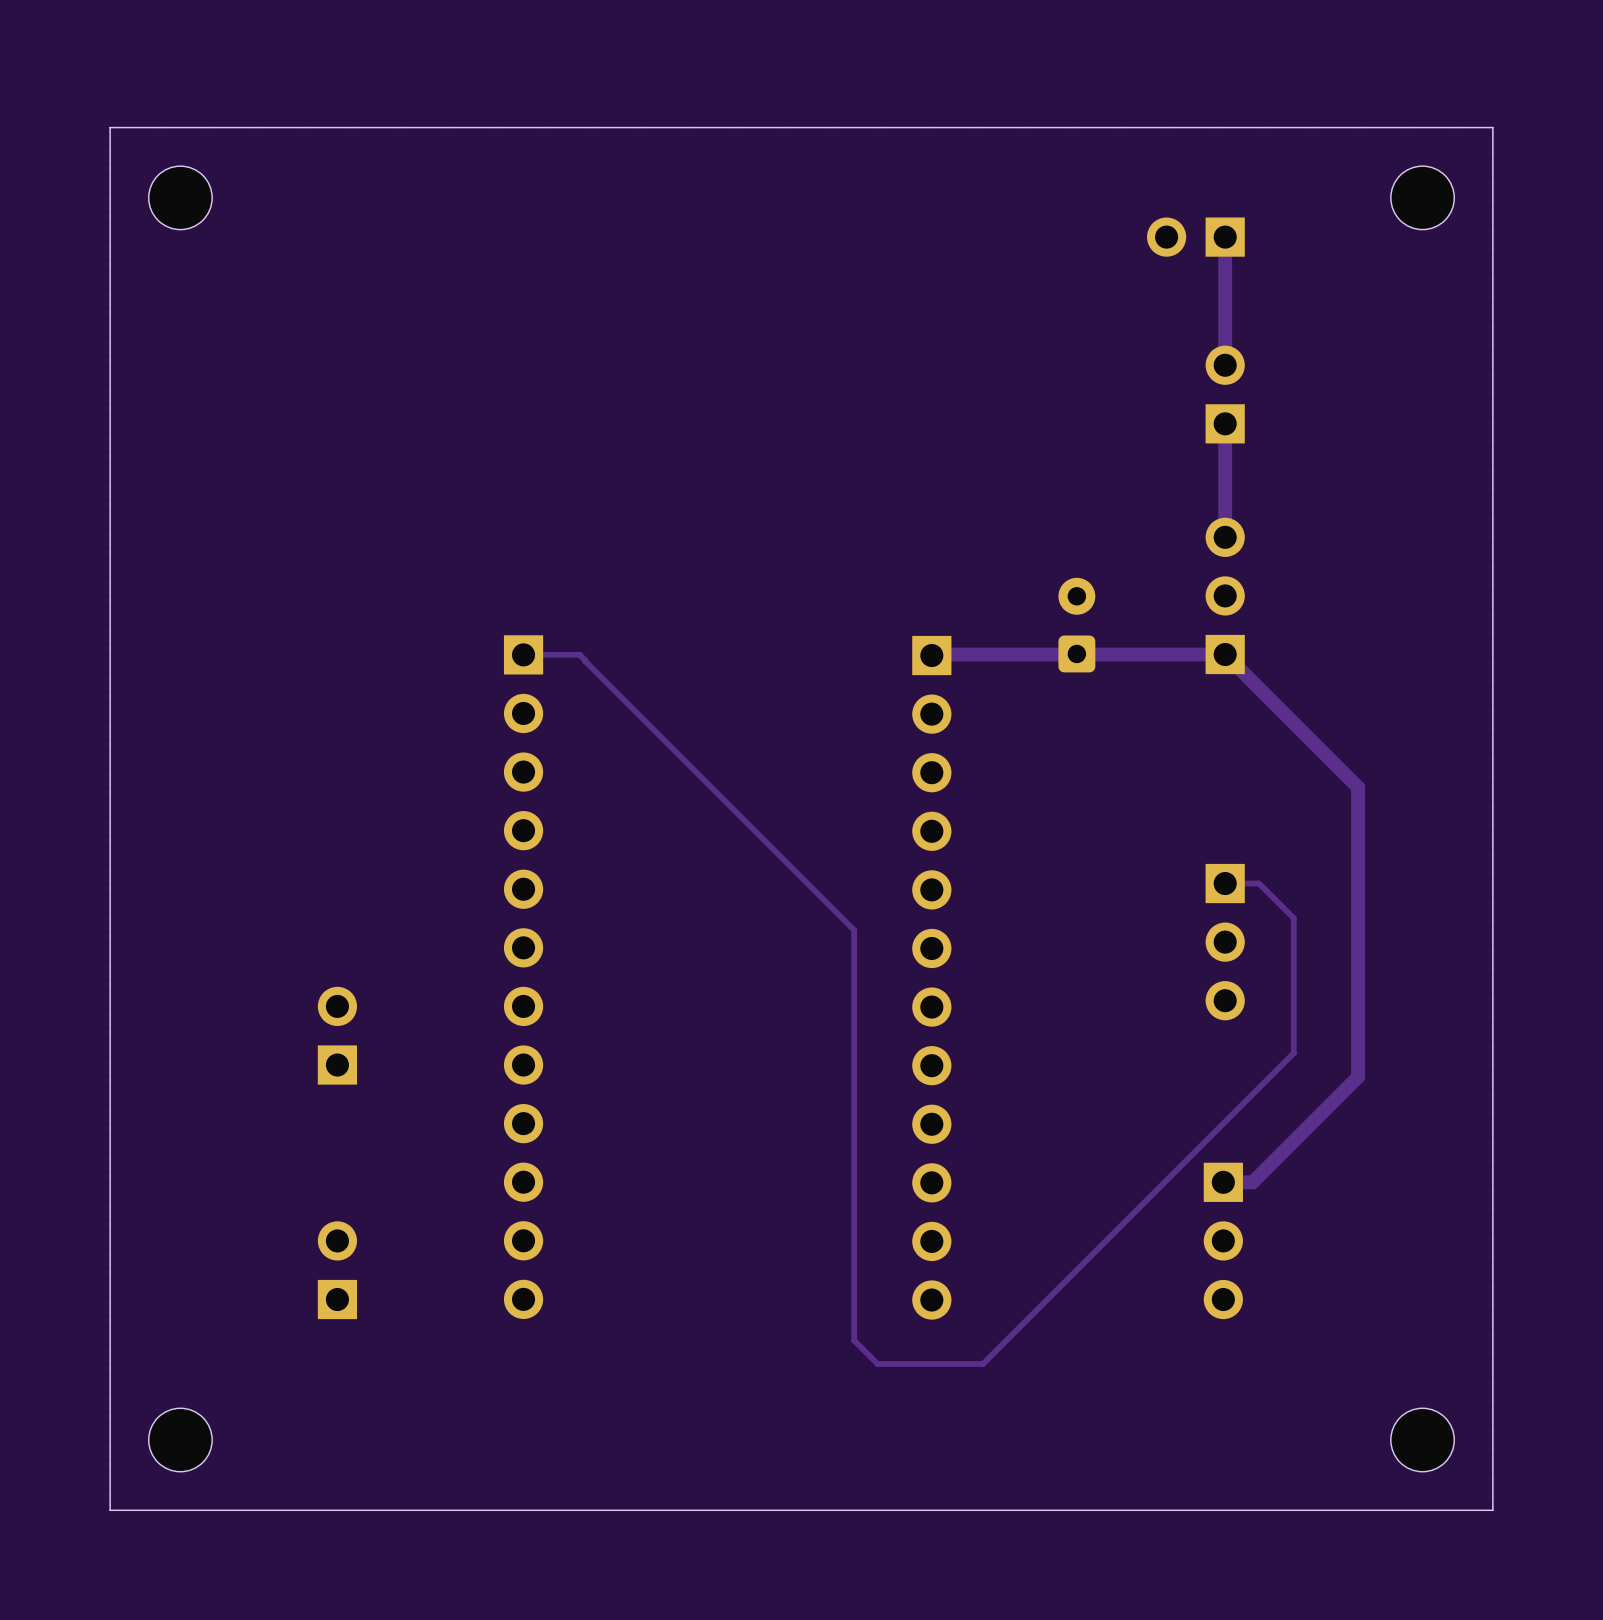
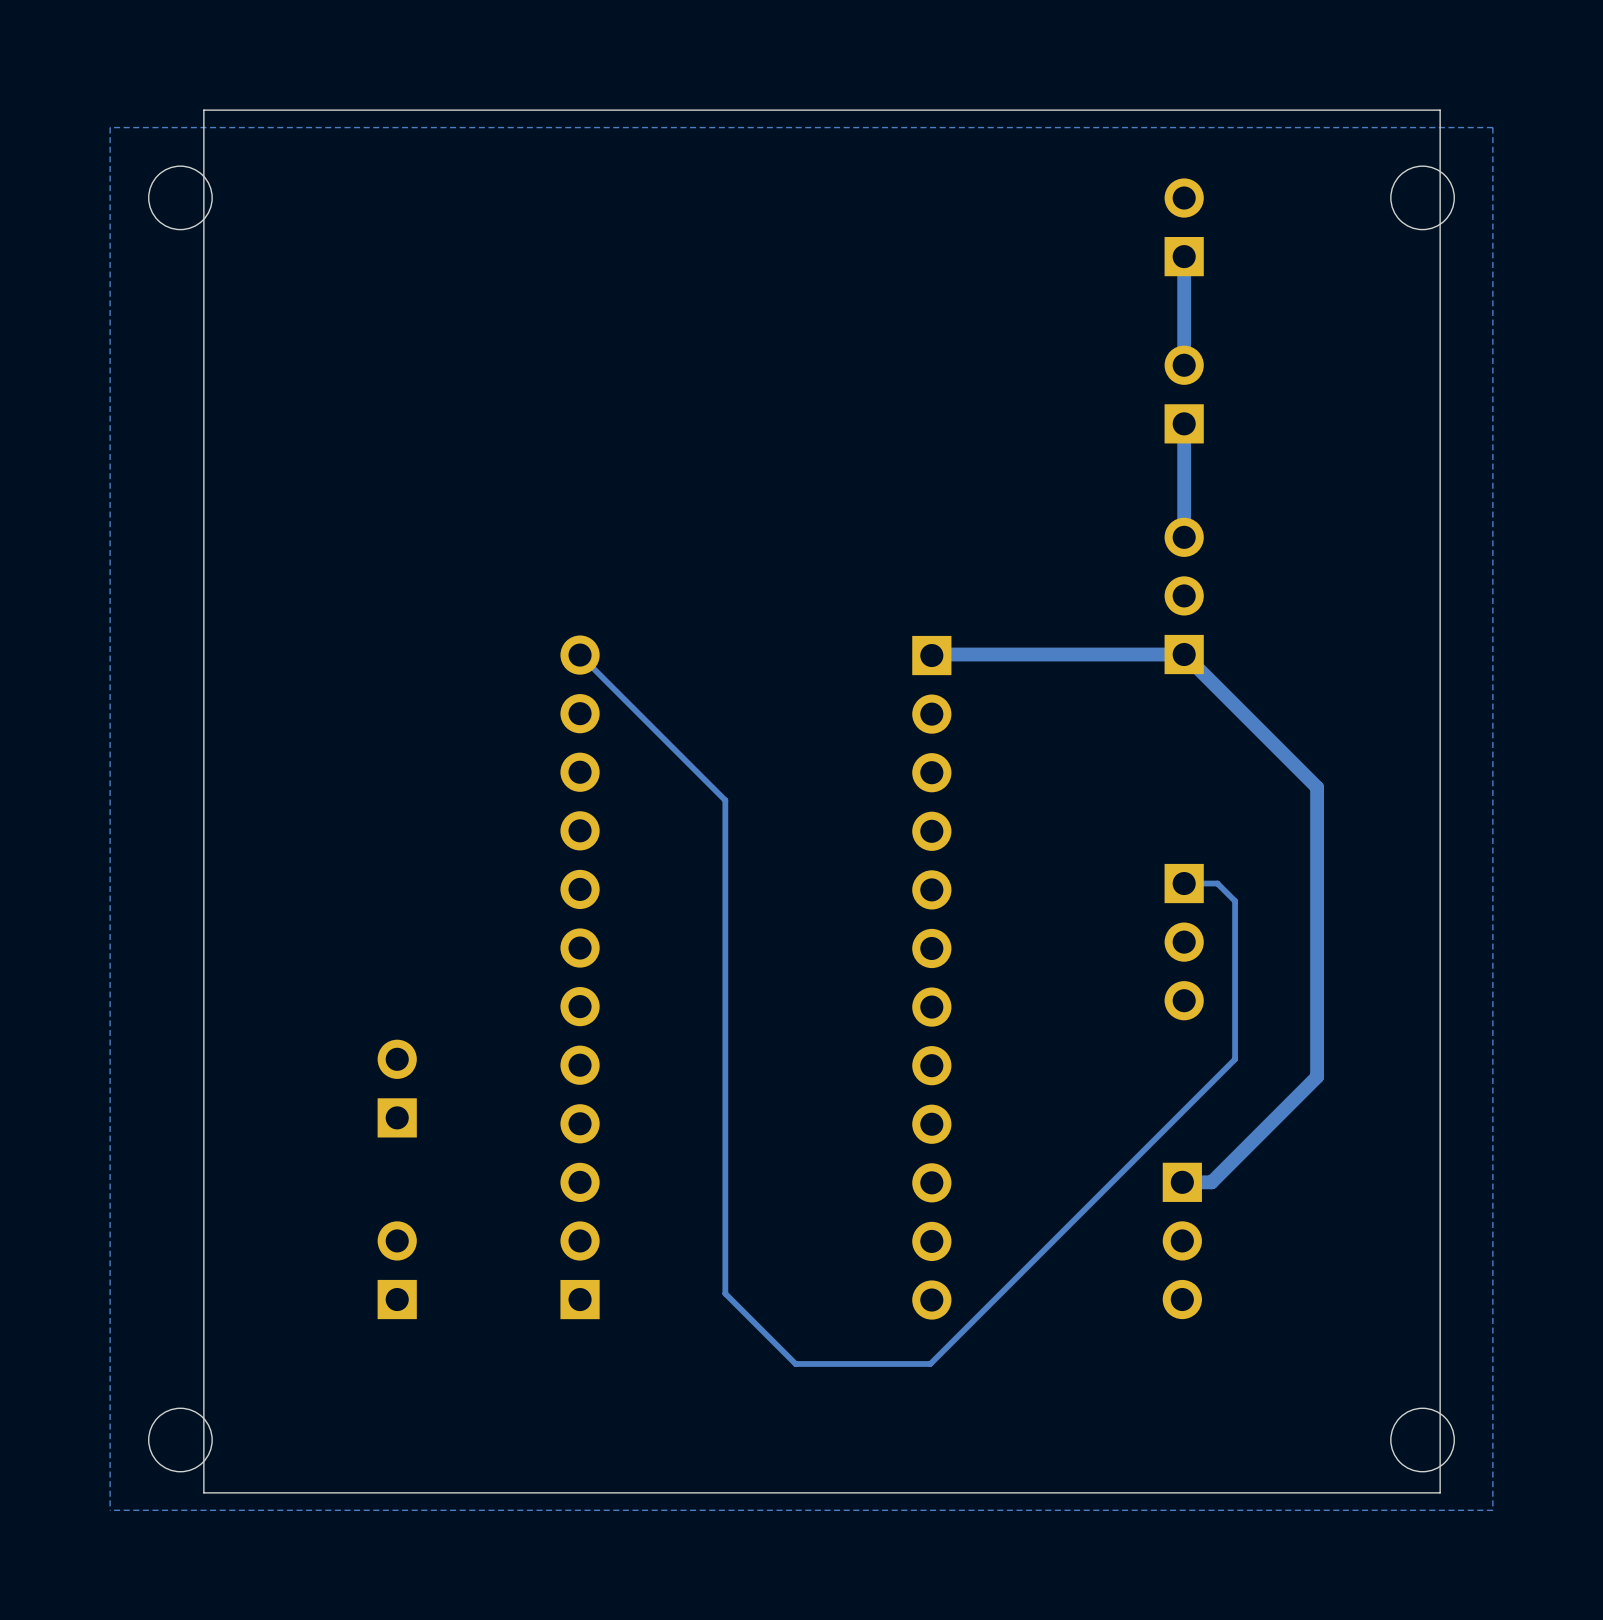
board edge: (1492, 127) (110, 127) (110, 1510) (1492, 1510) (1492, 127) -> (1440, 110) (1440, 1492) (203, 1492) (203, 110) (1440, 110)
part rotation: 0° (1195, 237) -> 90° clockwise (1184, 227)
track: (1225, 256) (1225, 365) -> (1184, 256) (1184, 365)
part position: (1225, 394) -> (1184, 394)
track: (1225, 423) (1225, 537) -> (1184, 423) (1184, 537)
part position: (1225, 595) -> (1184, 595)
part: (1076, 625) -> none
track: (579, 654) (523, 654) -> none
track: (1184, 654) (1225, 654) (1358, 787) (1358, 1076) (1252, 1182) (1223, 1182) -> (1184, 654) (1317, 787) (1317, 1076) (1211, 1182) (1182, 1182)
track: (585, 660) (854, 930) (854, 1340) (877, 1363) -> (585, 660) (725, 800) (725, 1293) (795, 1363) (877, 1363)
track: (1225, 883) (1259, 883) (1293, 918) (1293, 1053) (982, 1363) (930, 1363) -> (1184, 883) (1217, 883) (1235, 901) (1235, 1059) (930, 1363)
part position: (1225, 942) -> (1184, 942)
part rotation: 0° (523, 977) -> 180° (580, 977)
part position: (337, 1035) -> (397, 1088)
part position: (1223, 1240) -> (1182, 1240)
part position: (337, 1270) -> (397, 1270)

